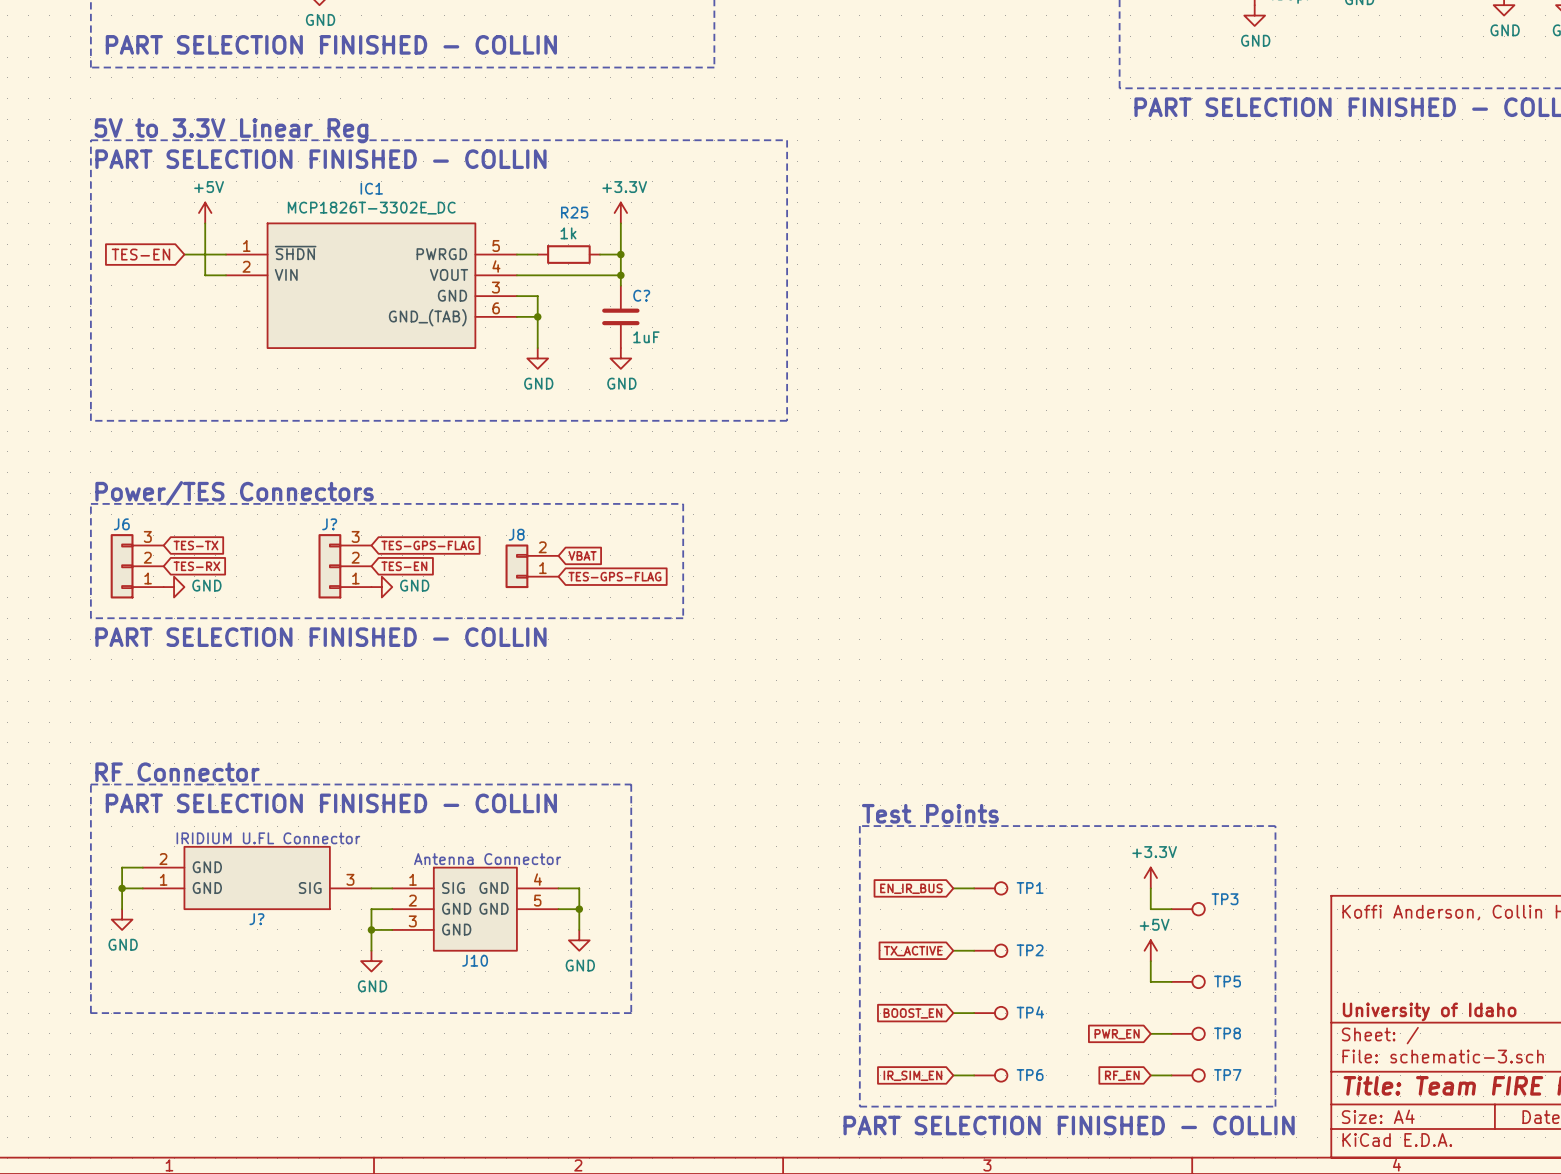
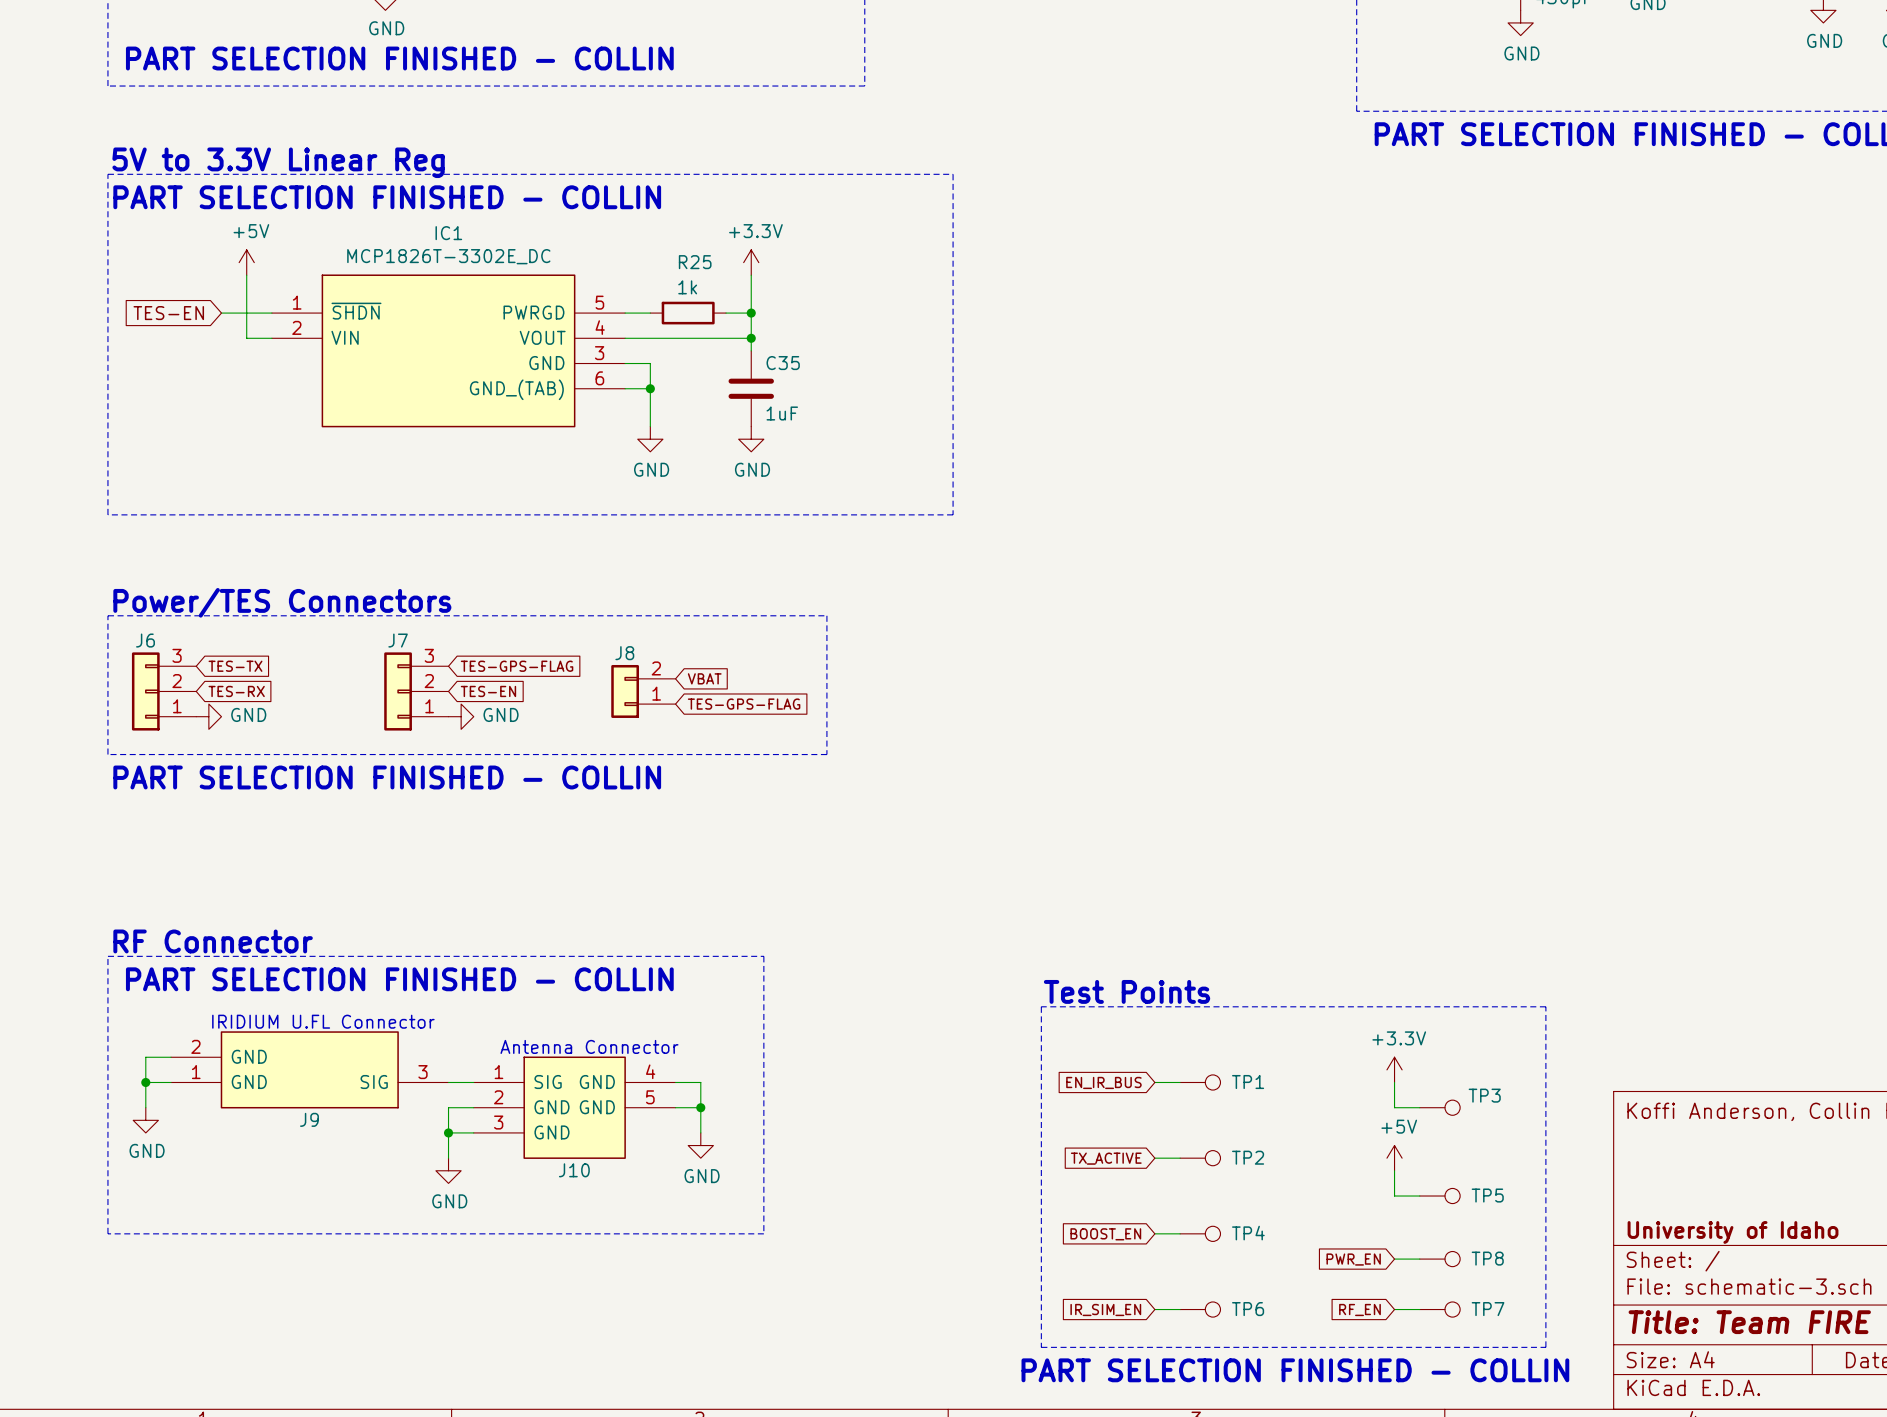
C? name: C? (641, 295) -> C35 (783, 363)
J? name: J? (329, 524) -> J7 (398, 640)
J? name: J? (256, 919) -> J9 (309, 1119)

